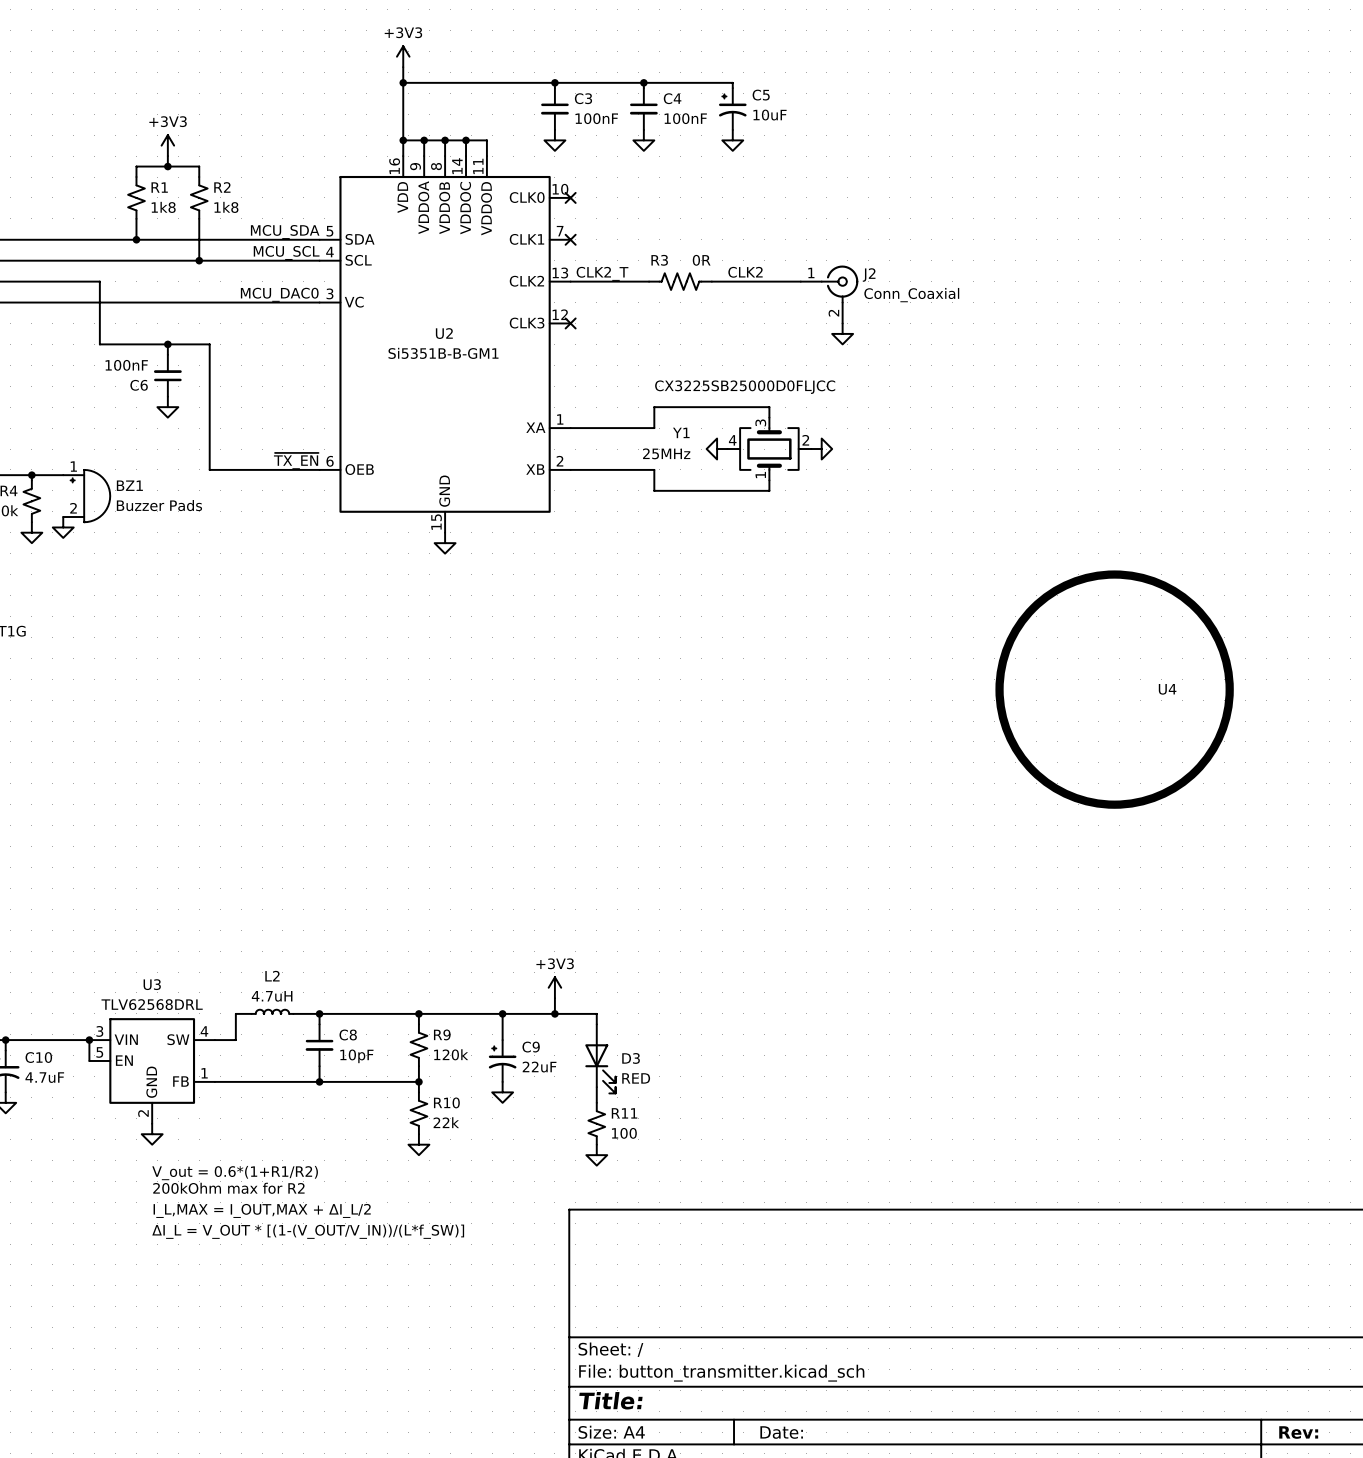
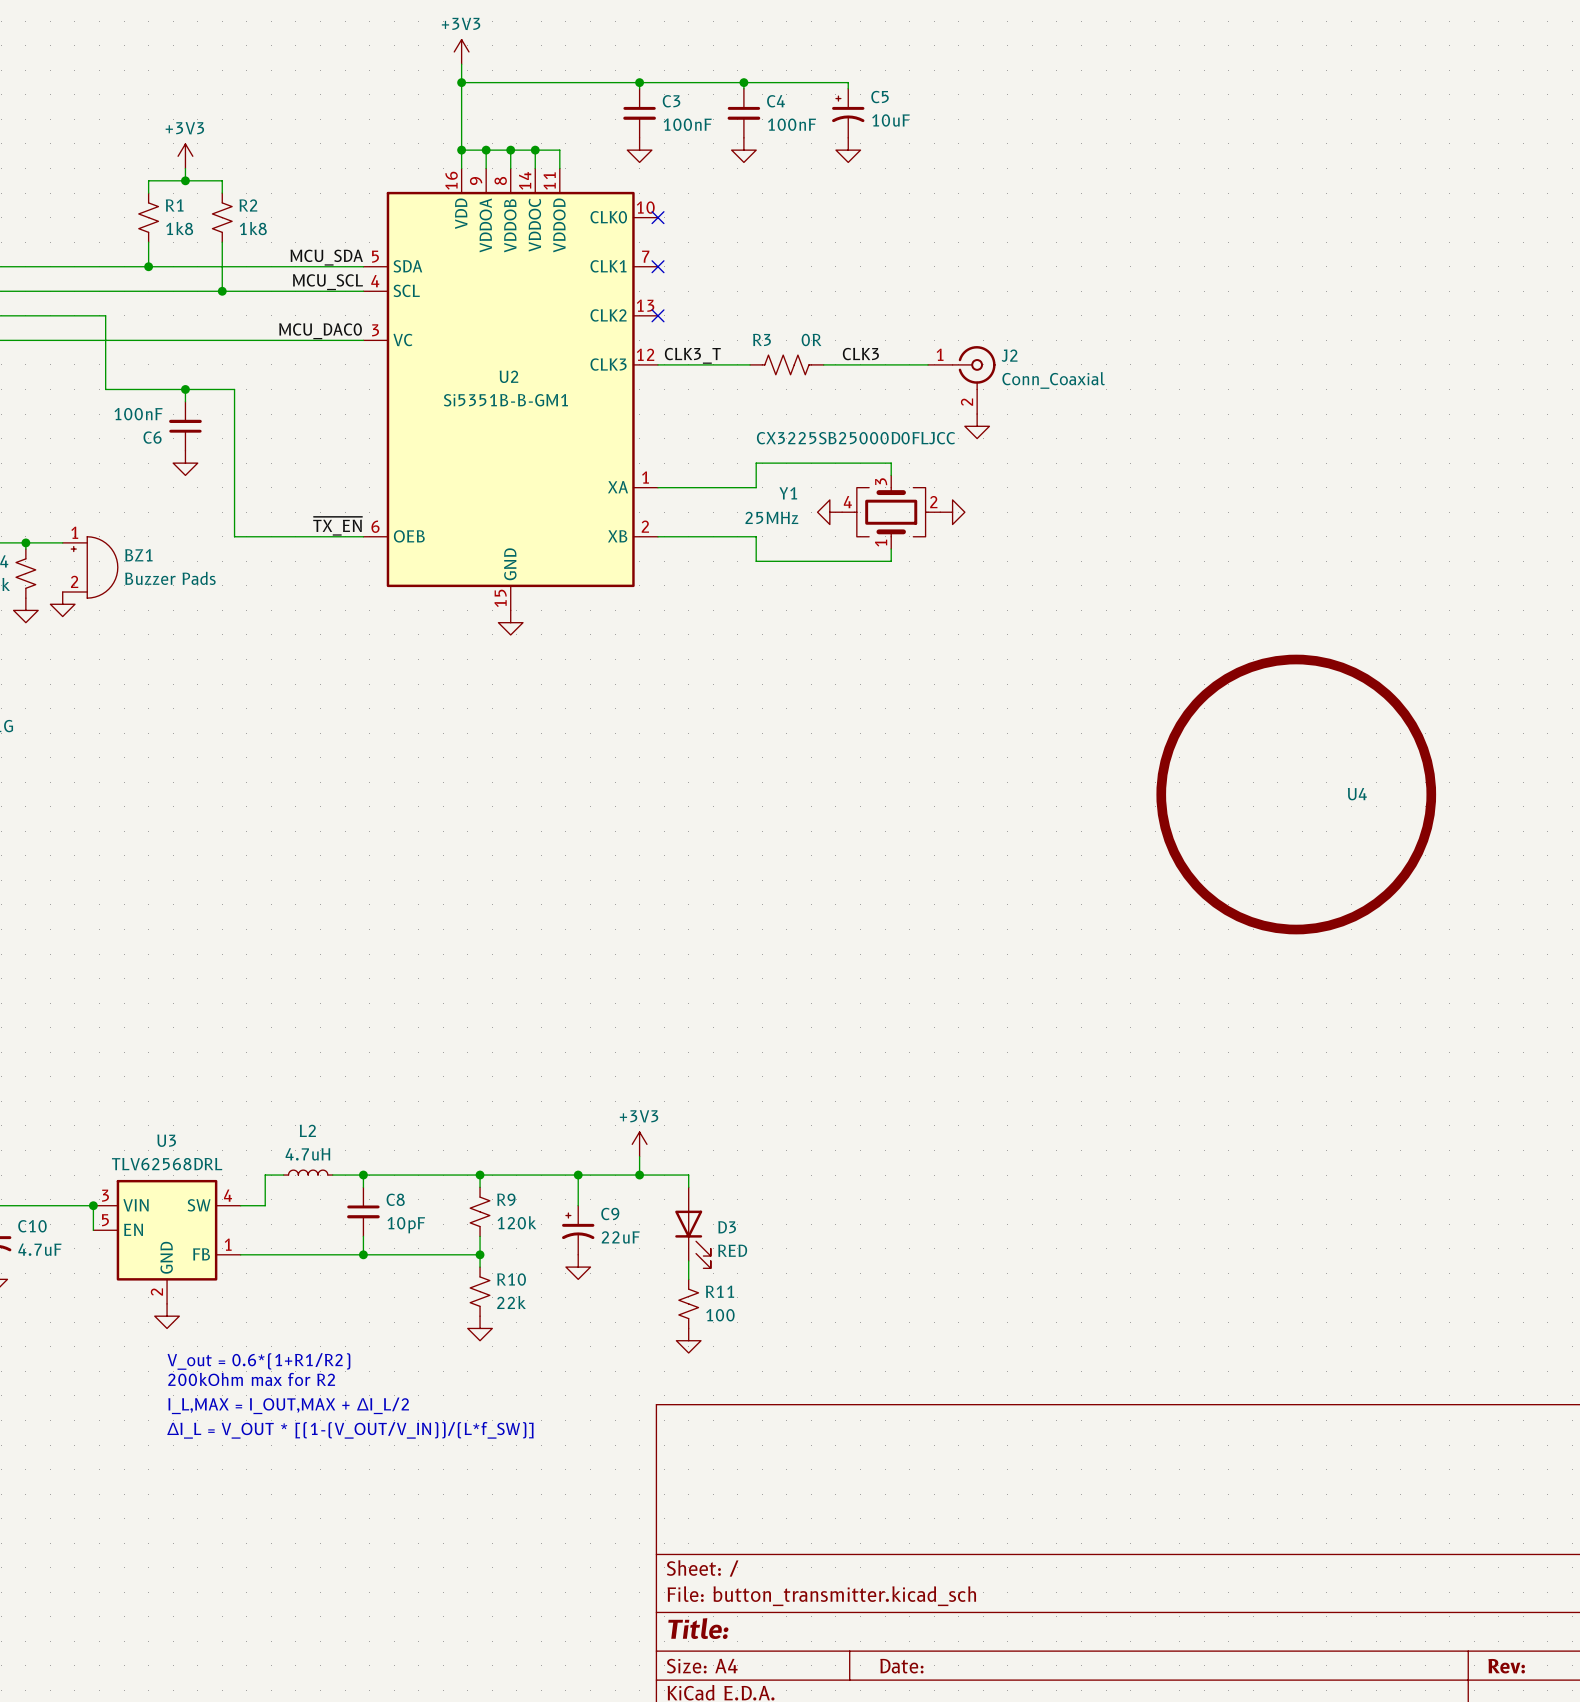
label: CLK2 (745, 272) -> none
label: CLK2_T (602, 273) -> none
wire: (570, 281) (649, 281) -> (658, 364) (750, 364)
R3 position: (680, 281) -> (786, 364)
wire: (711, 281) (800, 281) -> (823, 364) (928, 364)
J2 position: (829, 294) -> (961, 380)
label: none -> CLK3 (860, 354)
label: none -> CLK3_T (692, 355)
no-connect mark position: (570, 323) -> (658, 315)
power symbol position: (842, 333) -> (977, 426)

